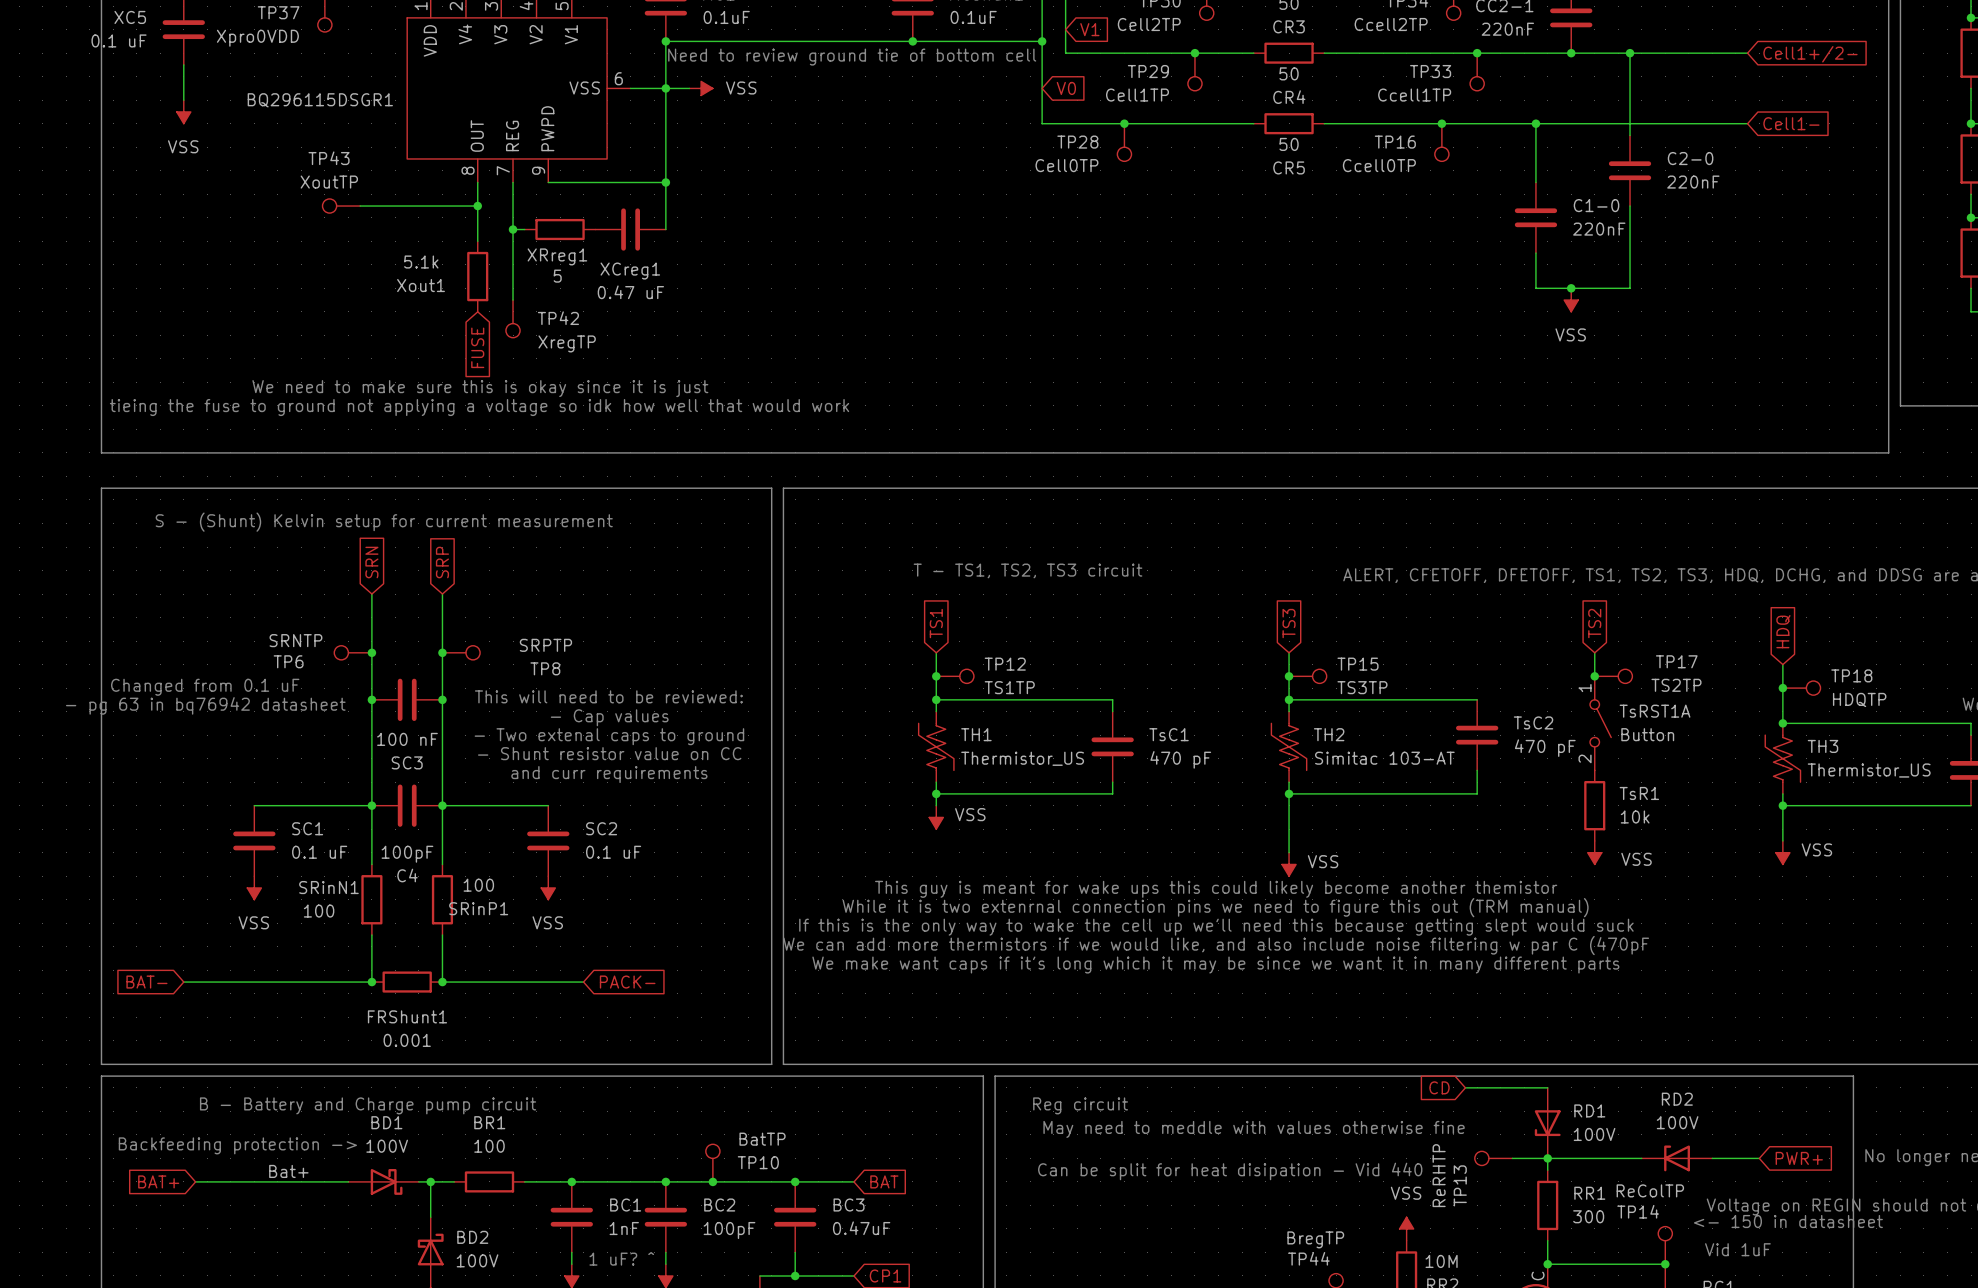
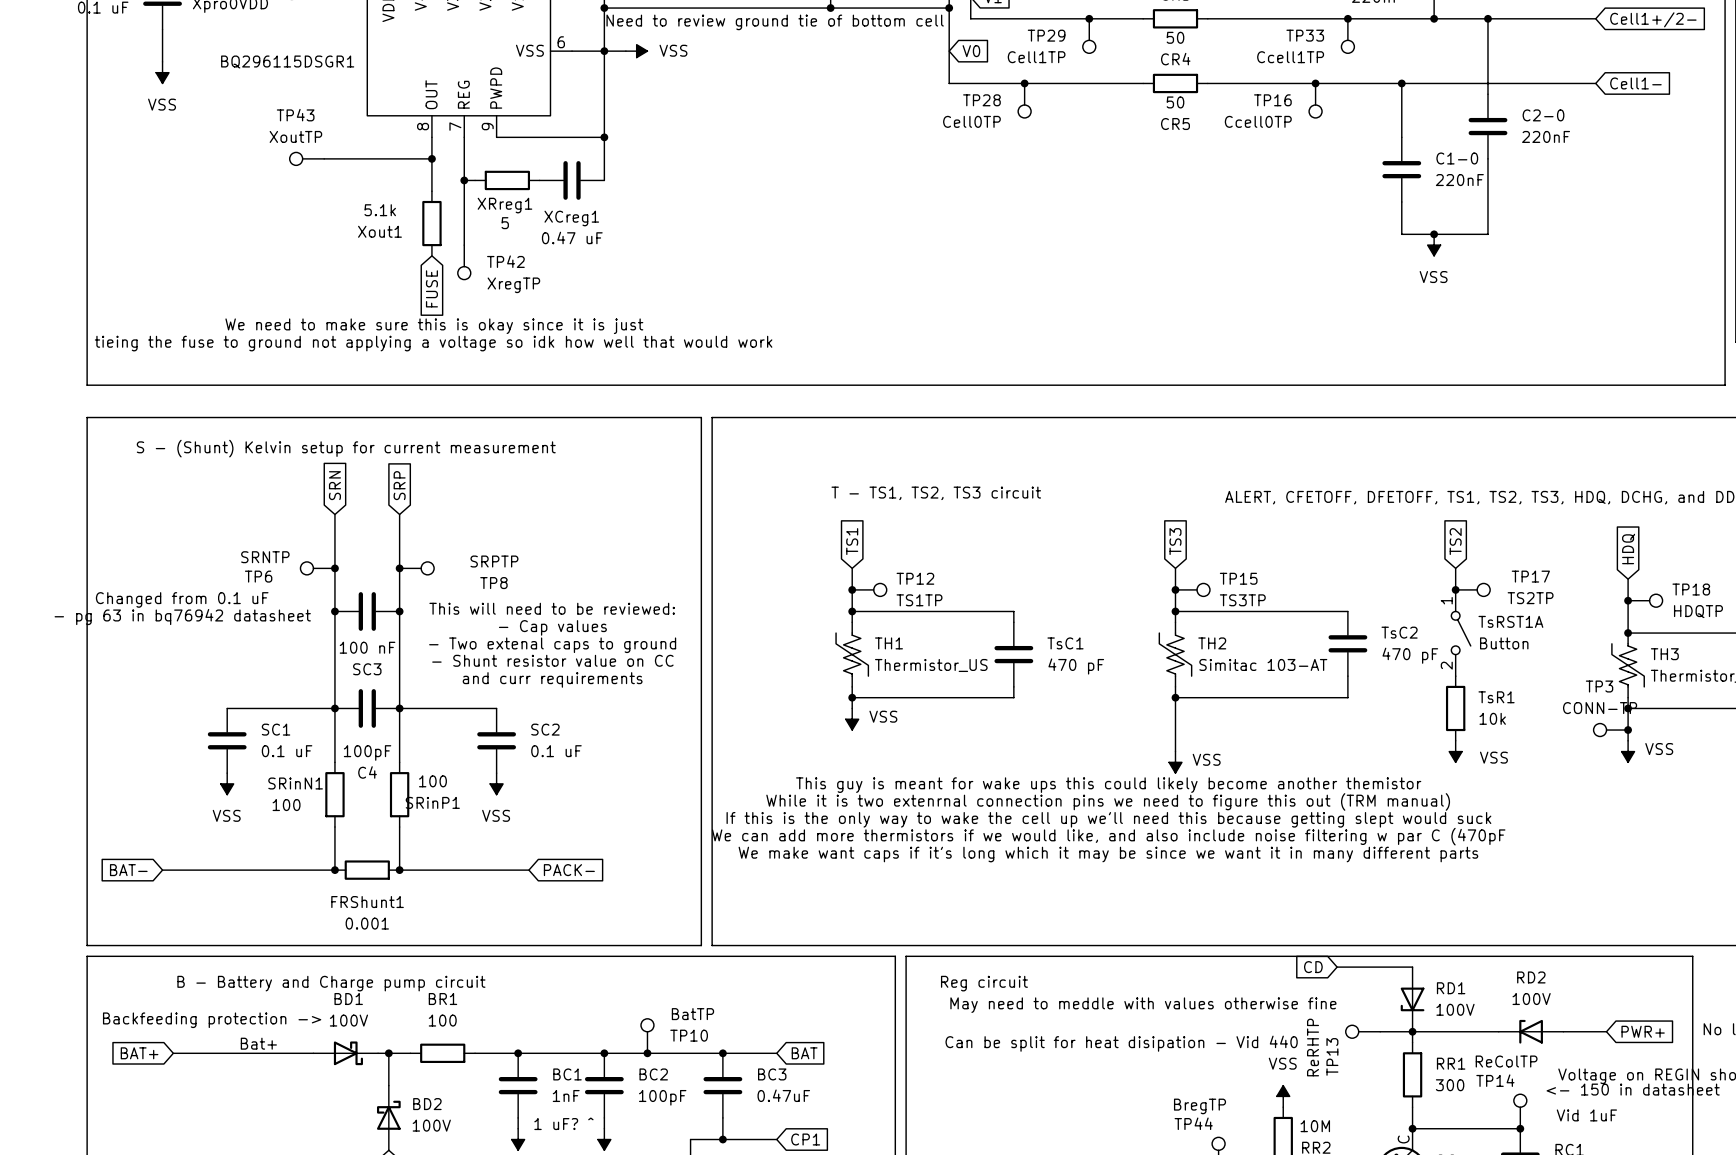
TP3: none -> CONN-TP (1610, 730)
junction: none -> (1628, 730)

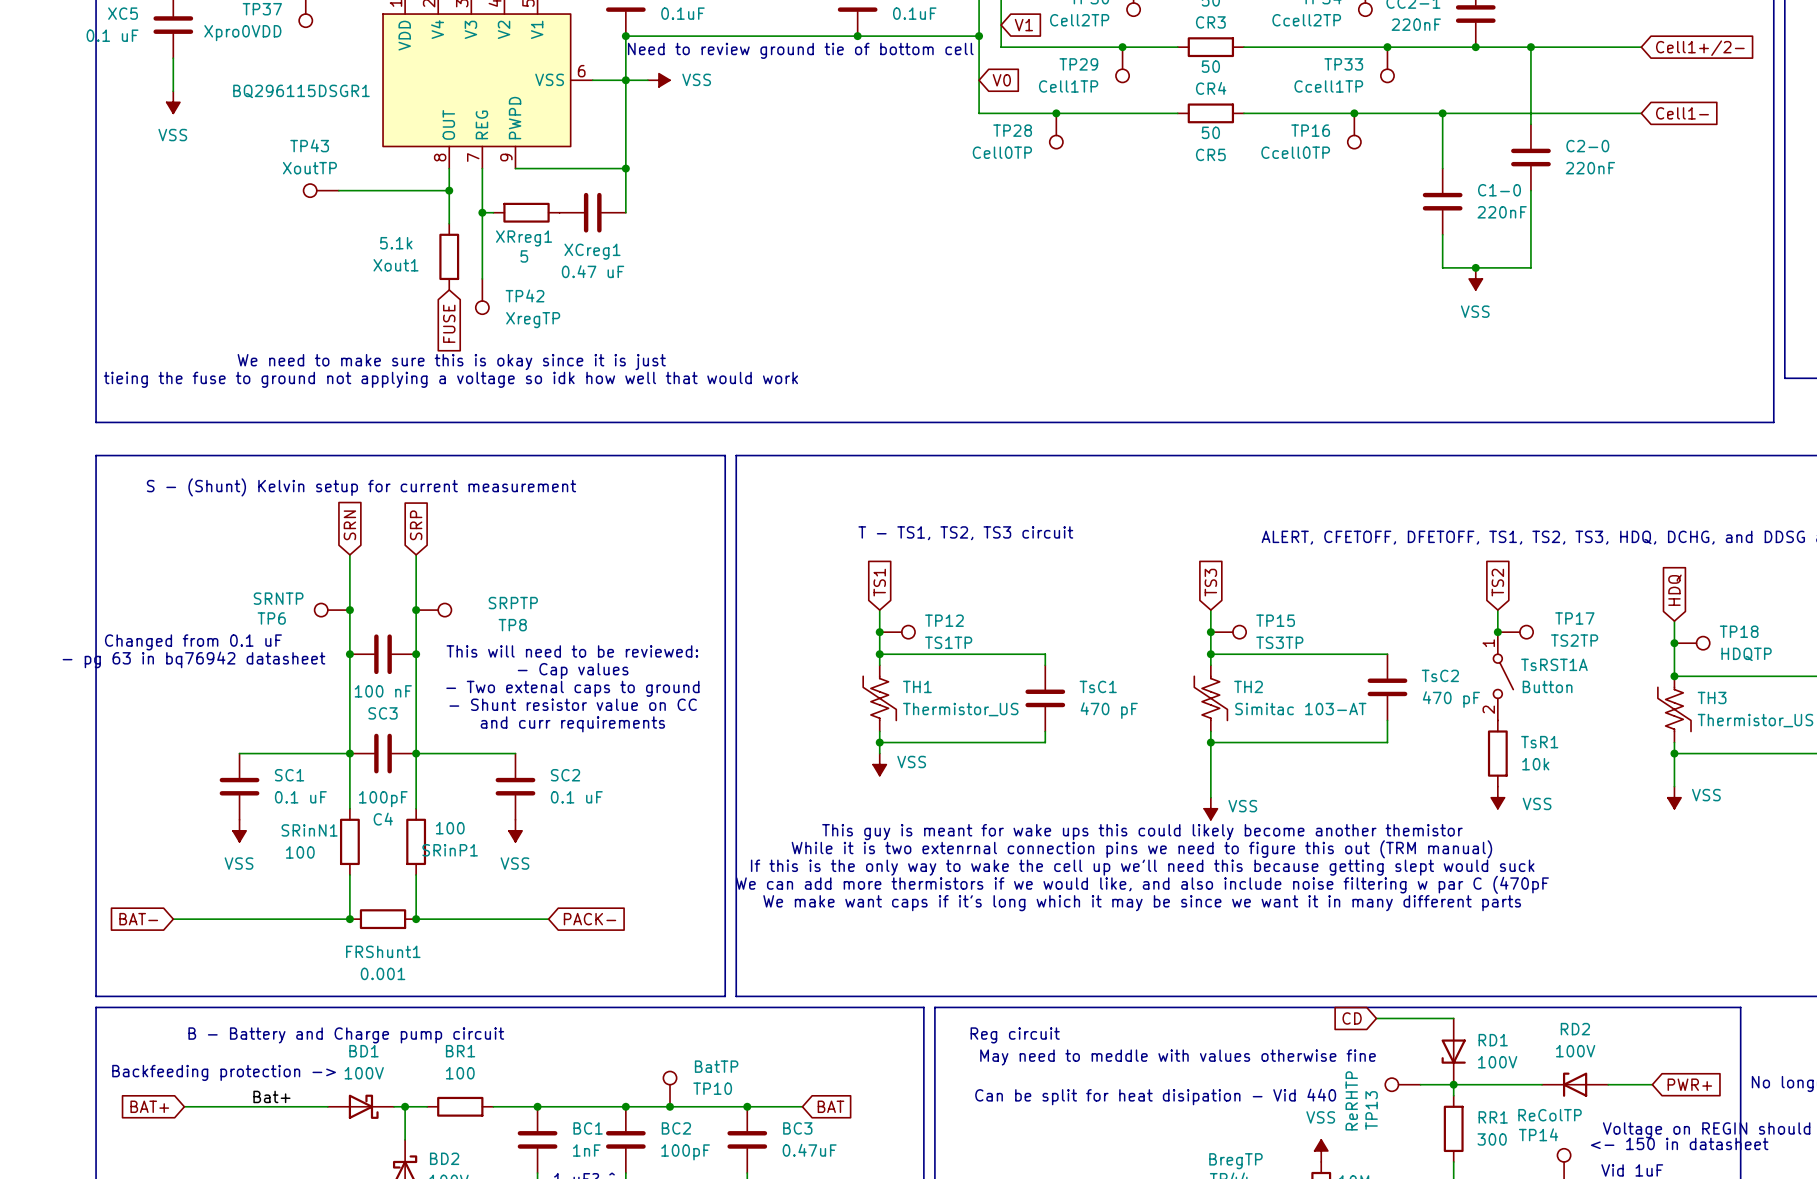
TP3: CONN-TP (1610, 730) -> none
junction: (1628, 730) -> none

